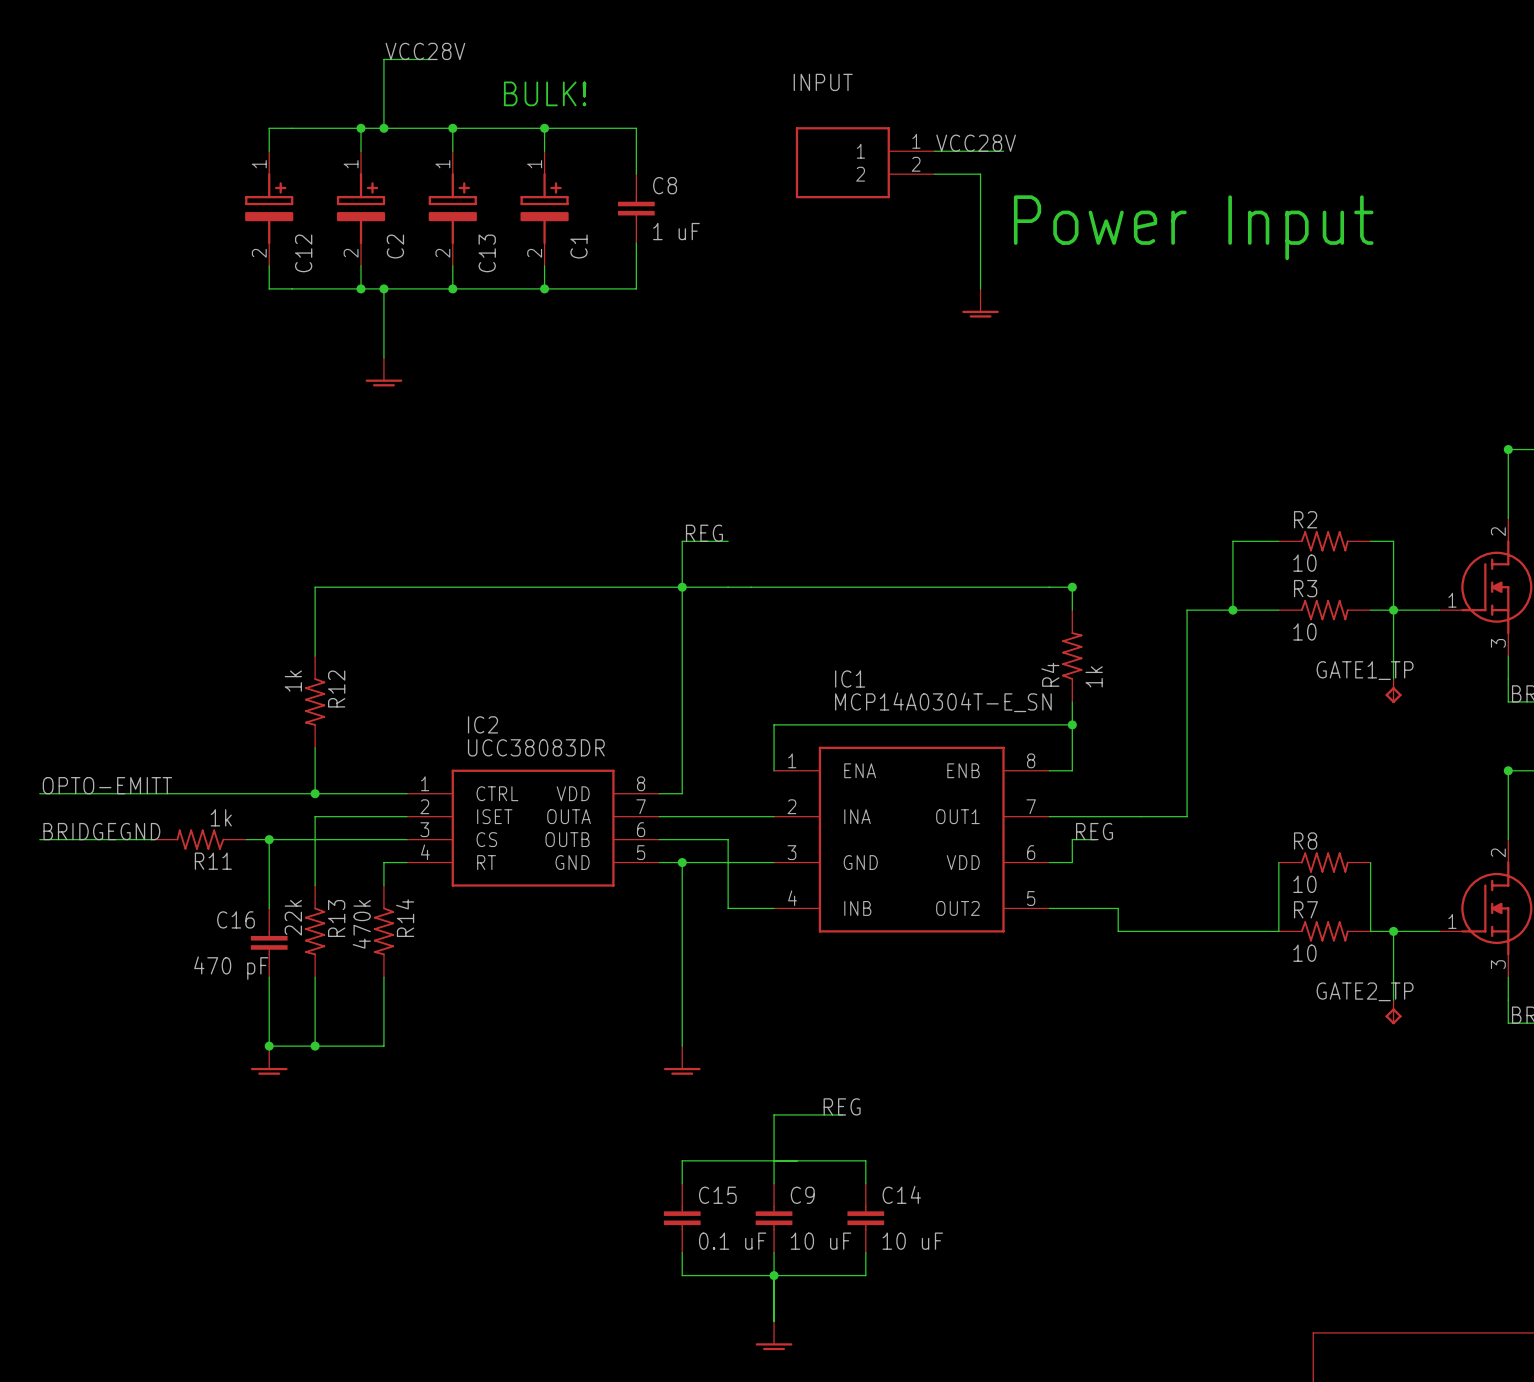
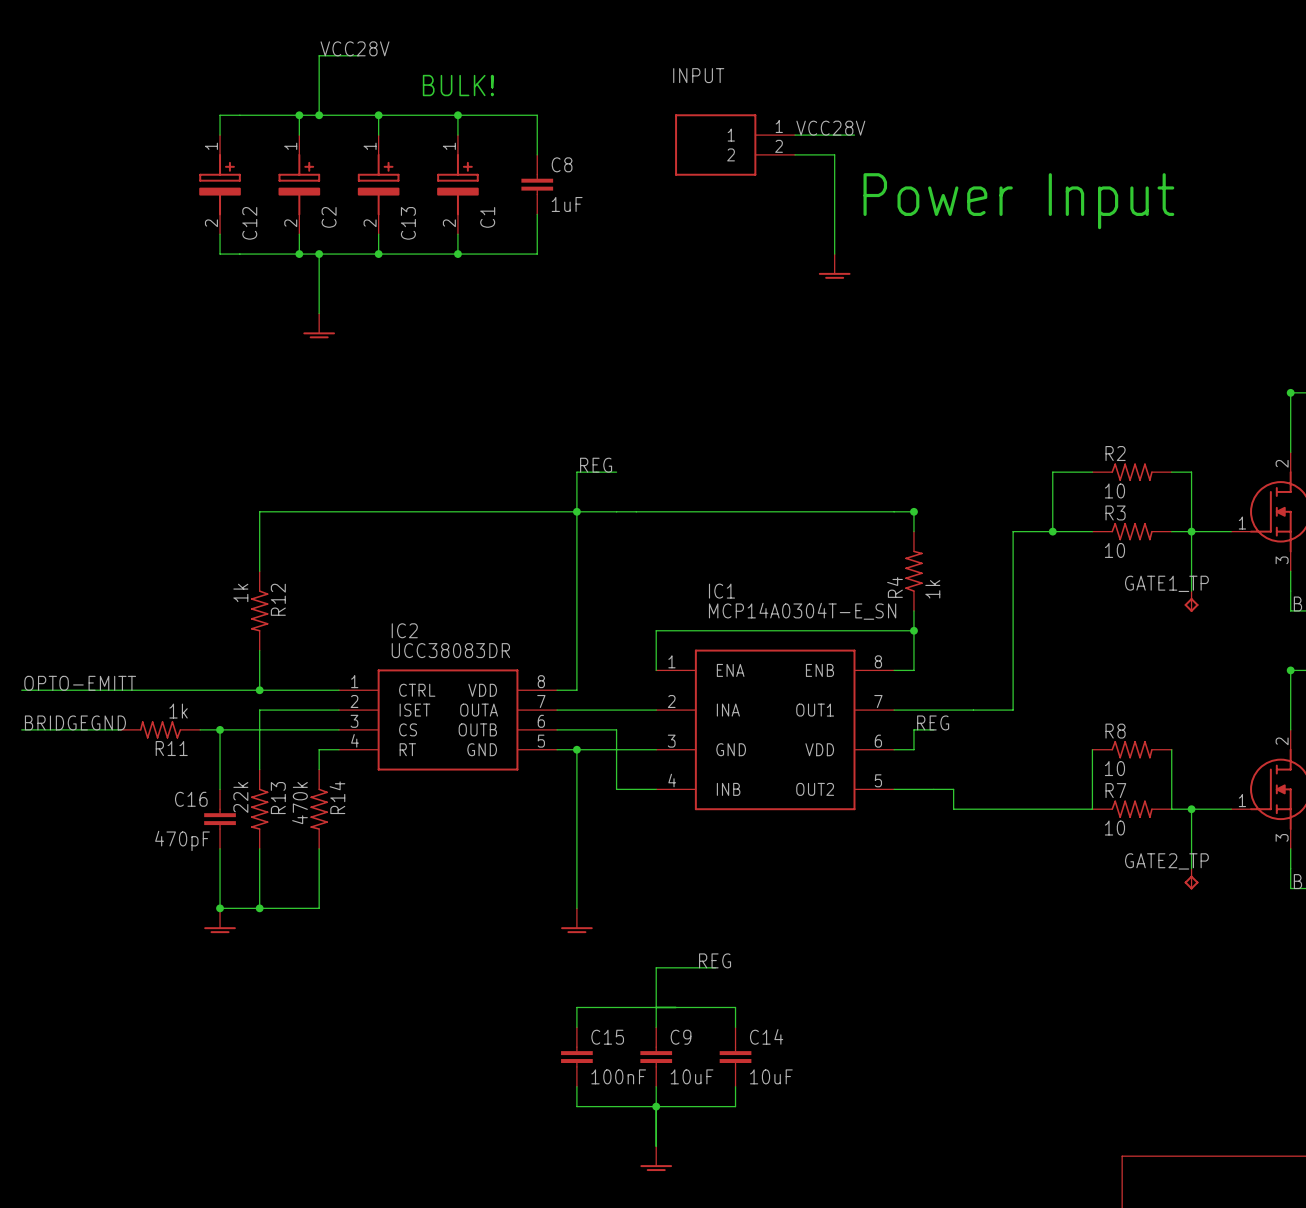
C8 value: 1 uF (676, 231) -> 1uF (567, 204)
C16 value: 470 pF (231, 968) -> 470pF (182, 840)
C15 value: 0.1 uF (732, 1241) -> 100nF (618, 1076)
C9 value: 10 uF (821, 1241) -> 10uF (692, 1076)
C14 value: 10 uF (912, 1241) -> 10uF (771, 1076)

